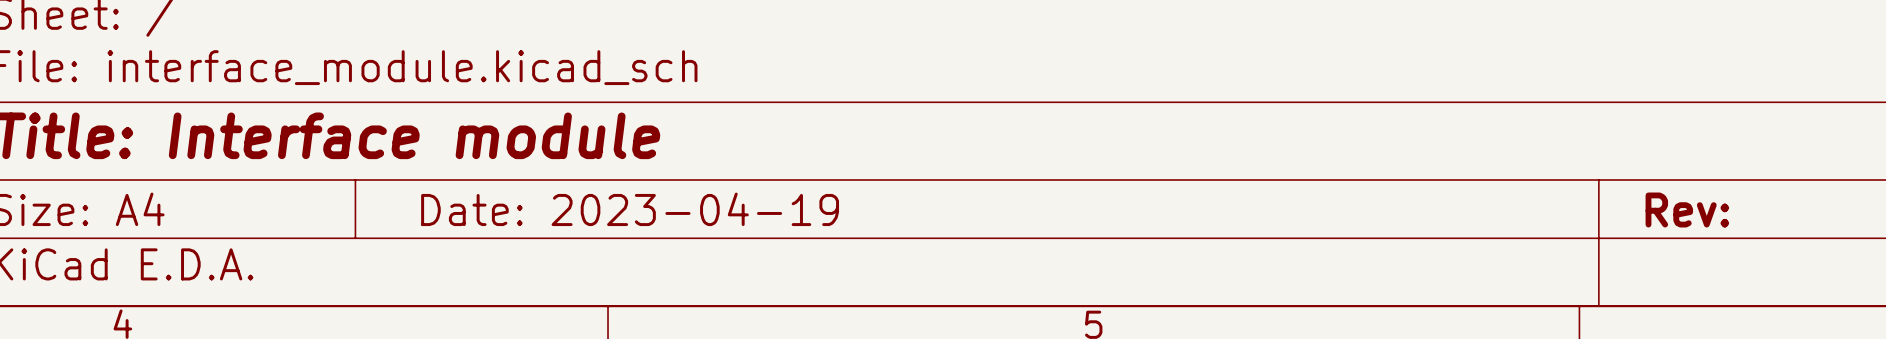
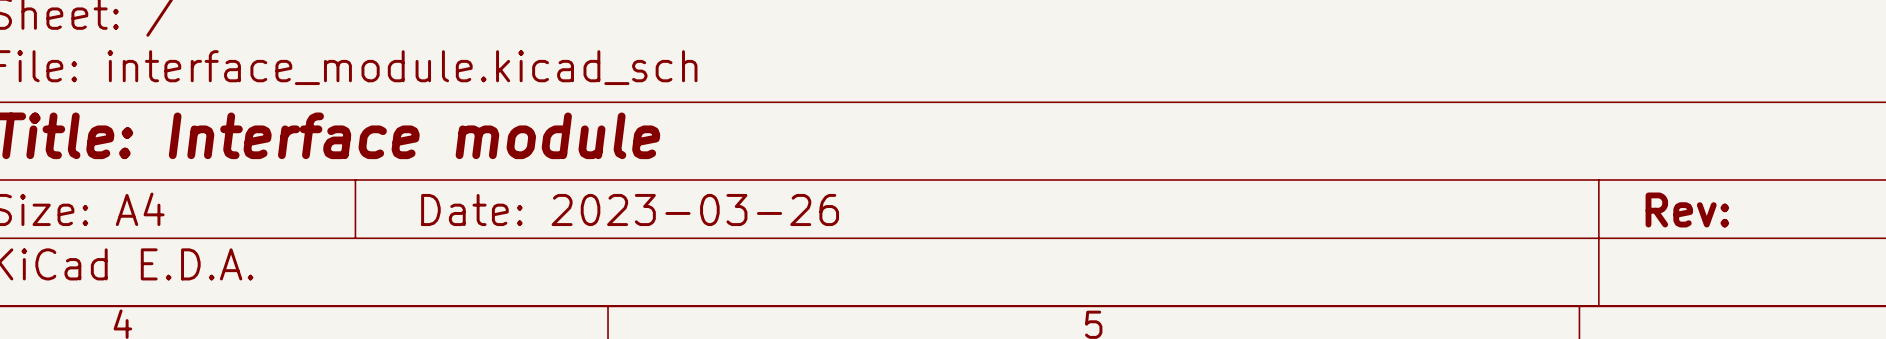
title block: Date: 2023-04-19 (630, 209) -> Date: 2023-03-26 (630, 210)

